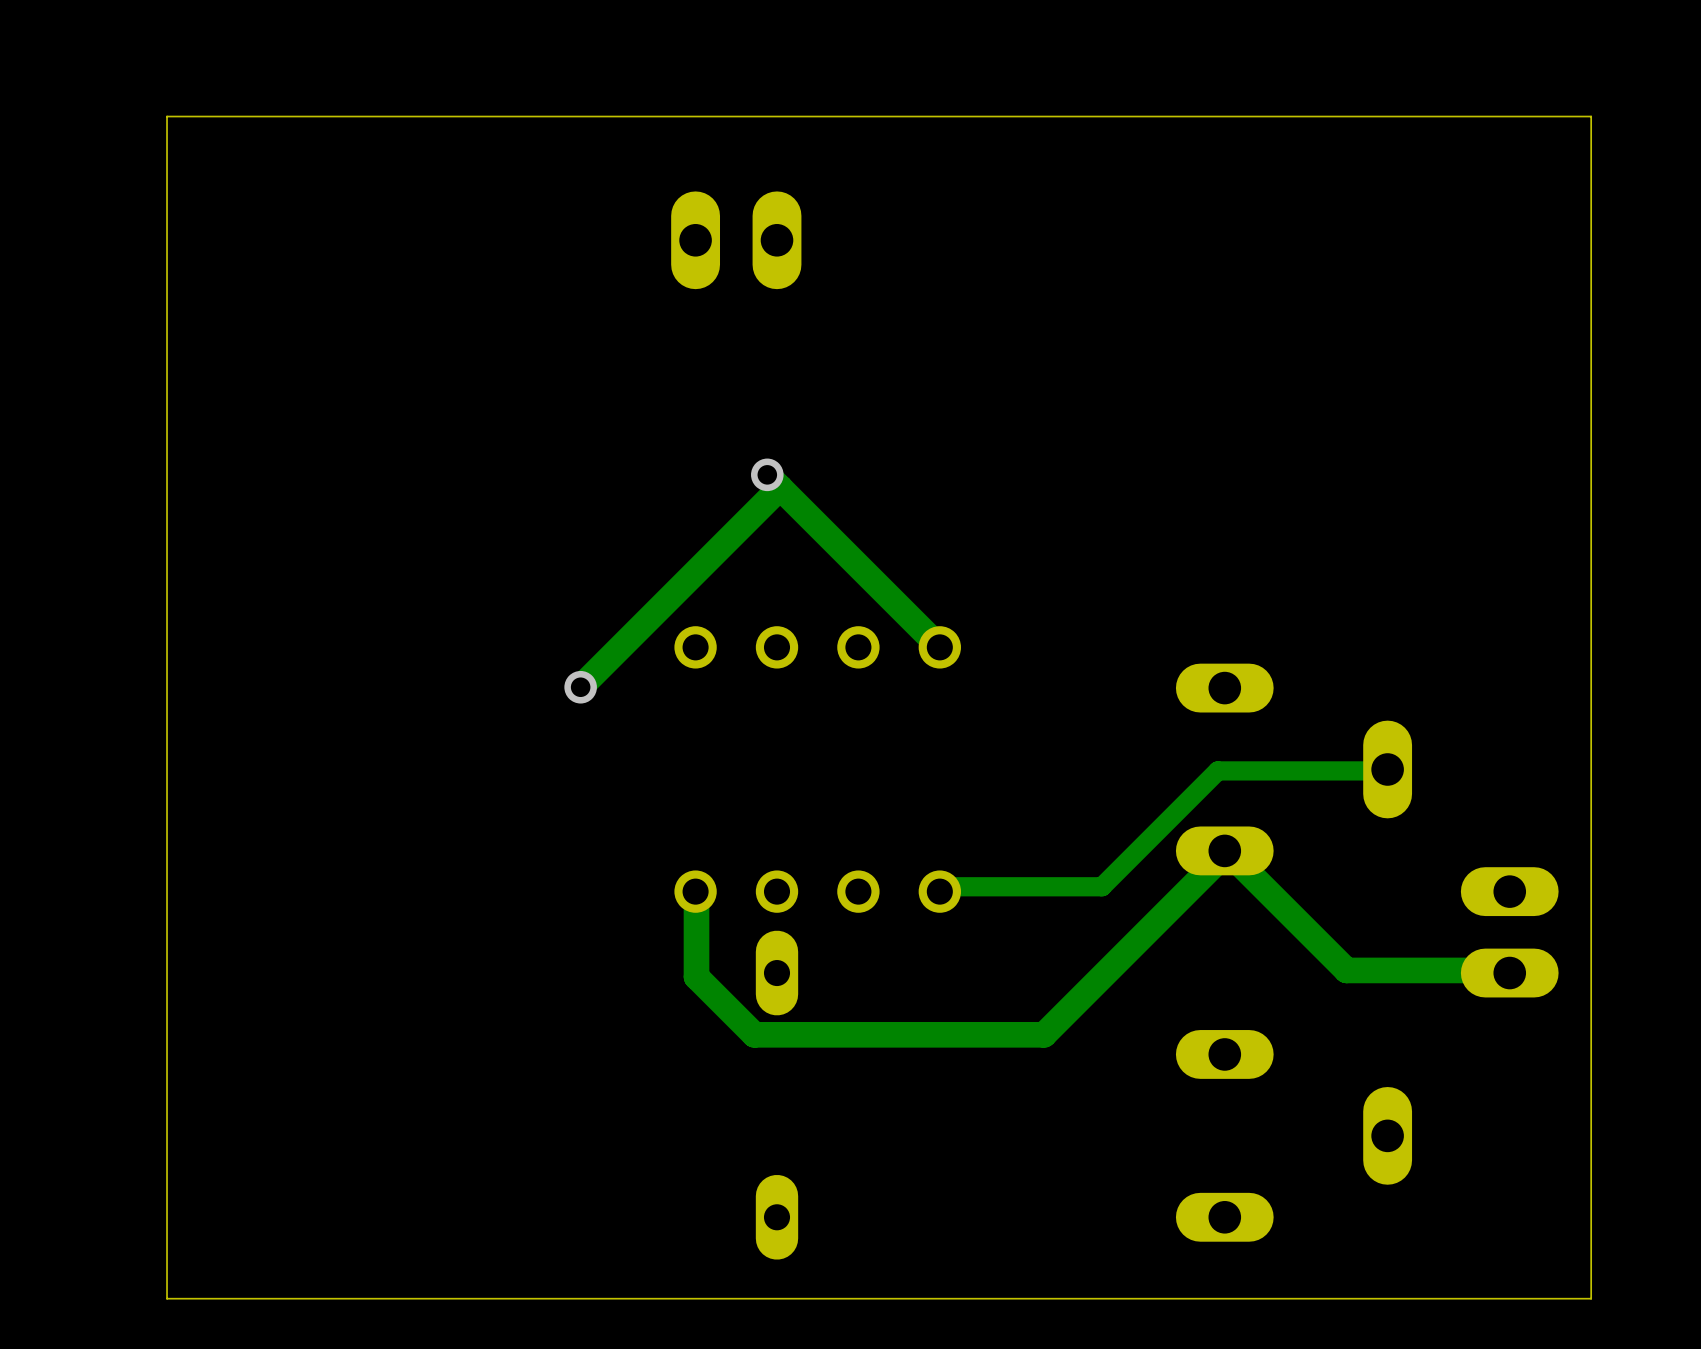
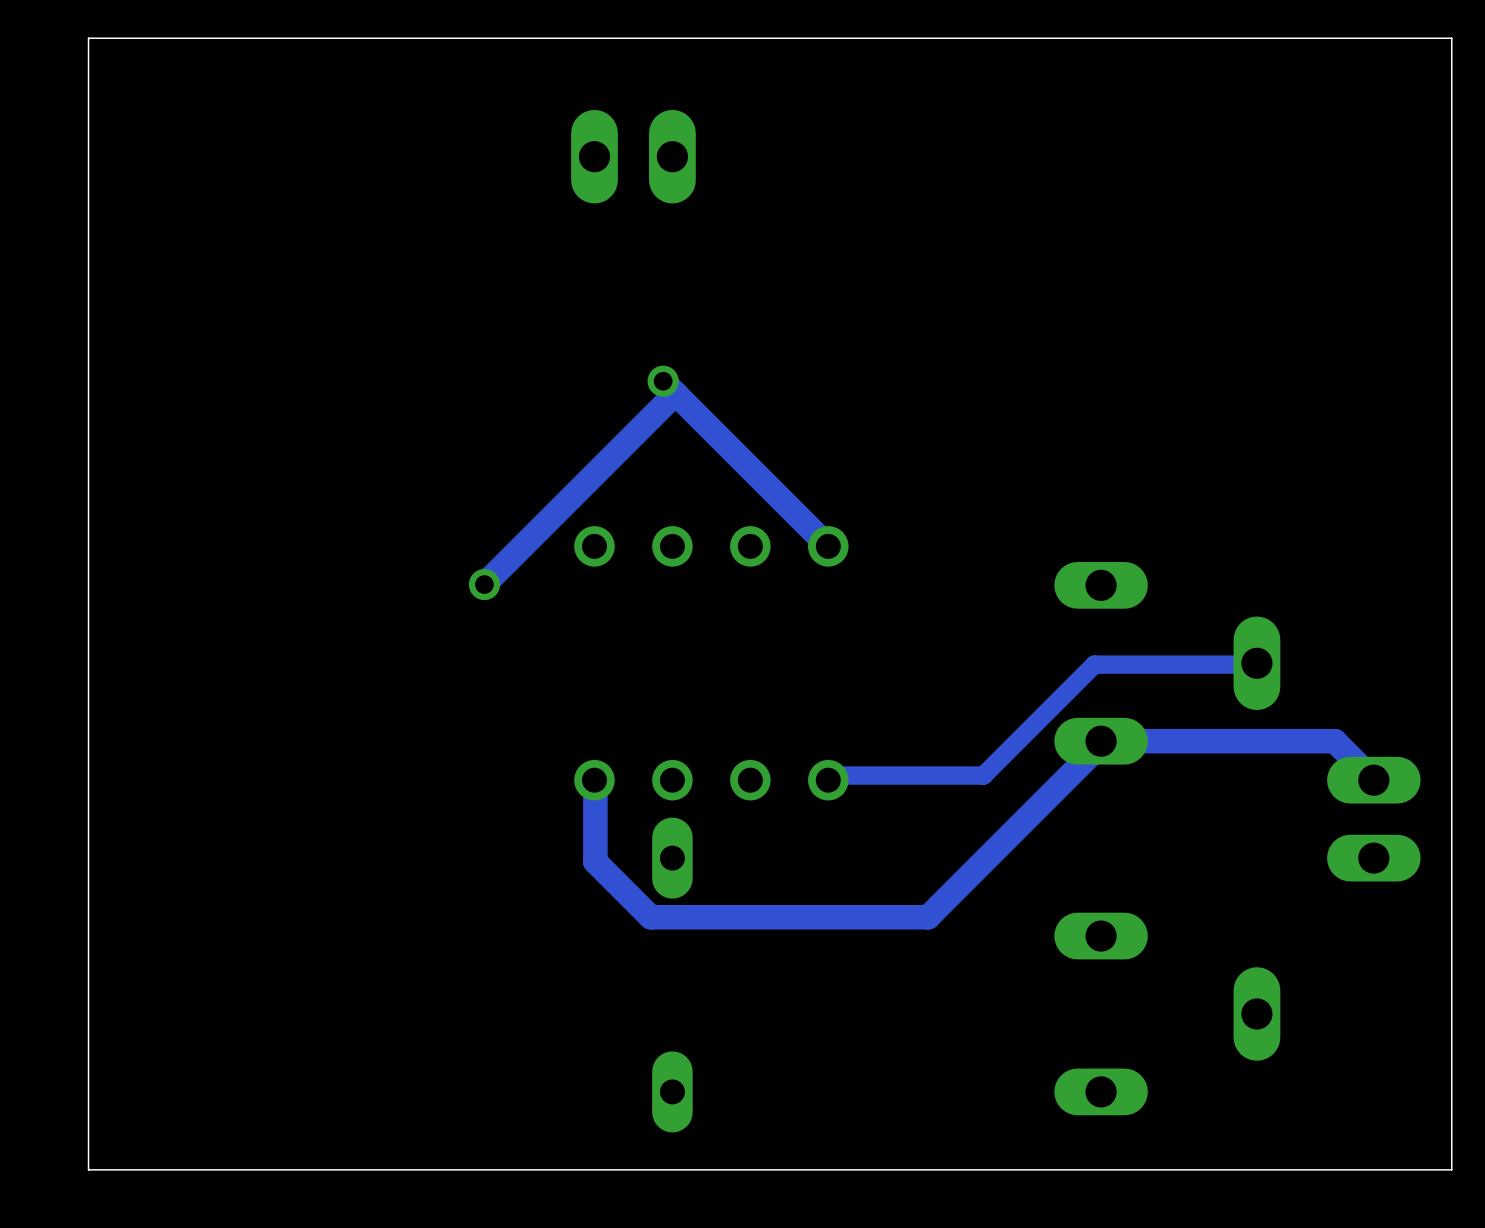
track: none -> (1101, 741) (1334, 741) (1373, 780)
track: (1230, 854) (1346, 970) (1507, 970) (1509, 973) -> none

